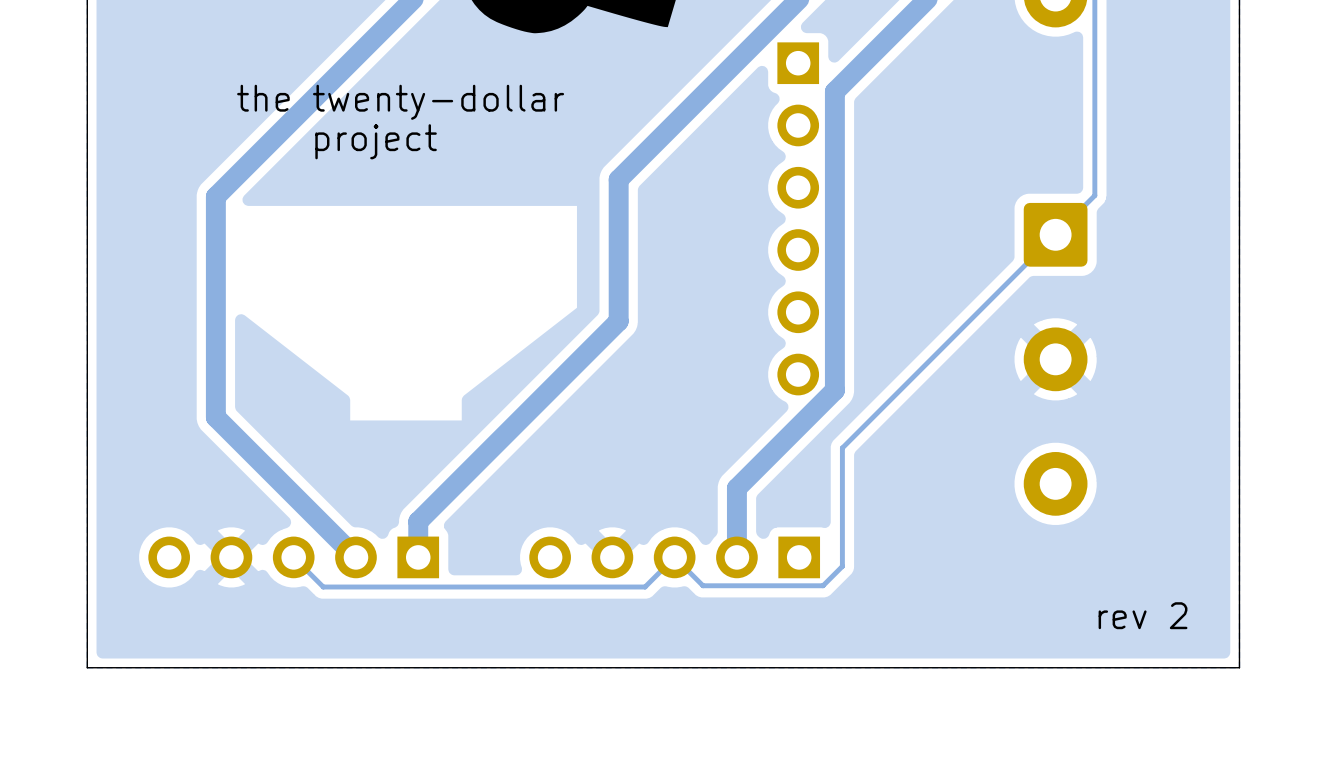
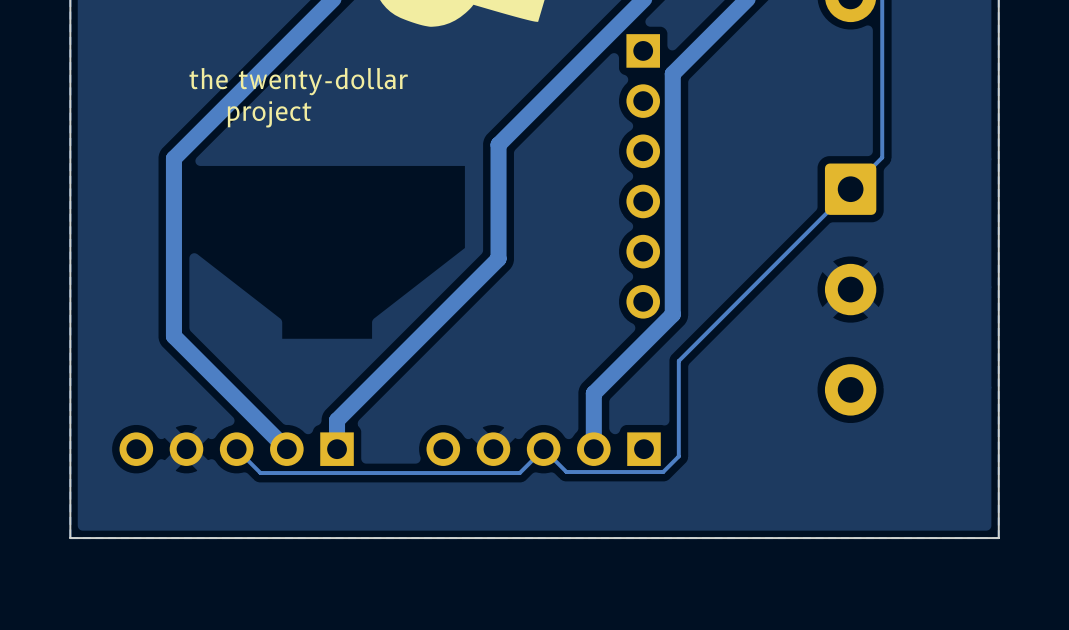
text: rev 2 (1143, 615) -> none

